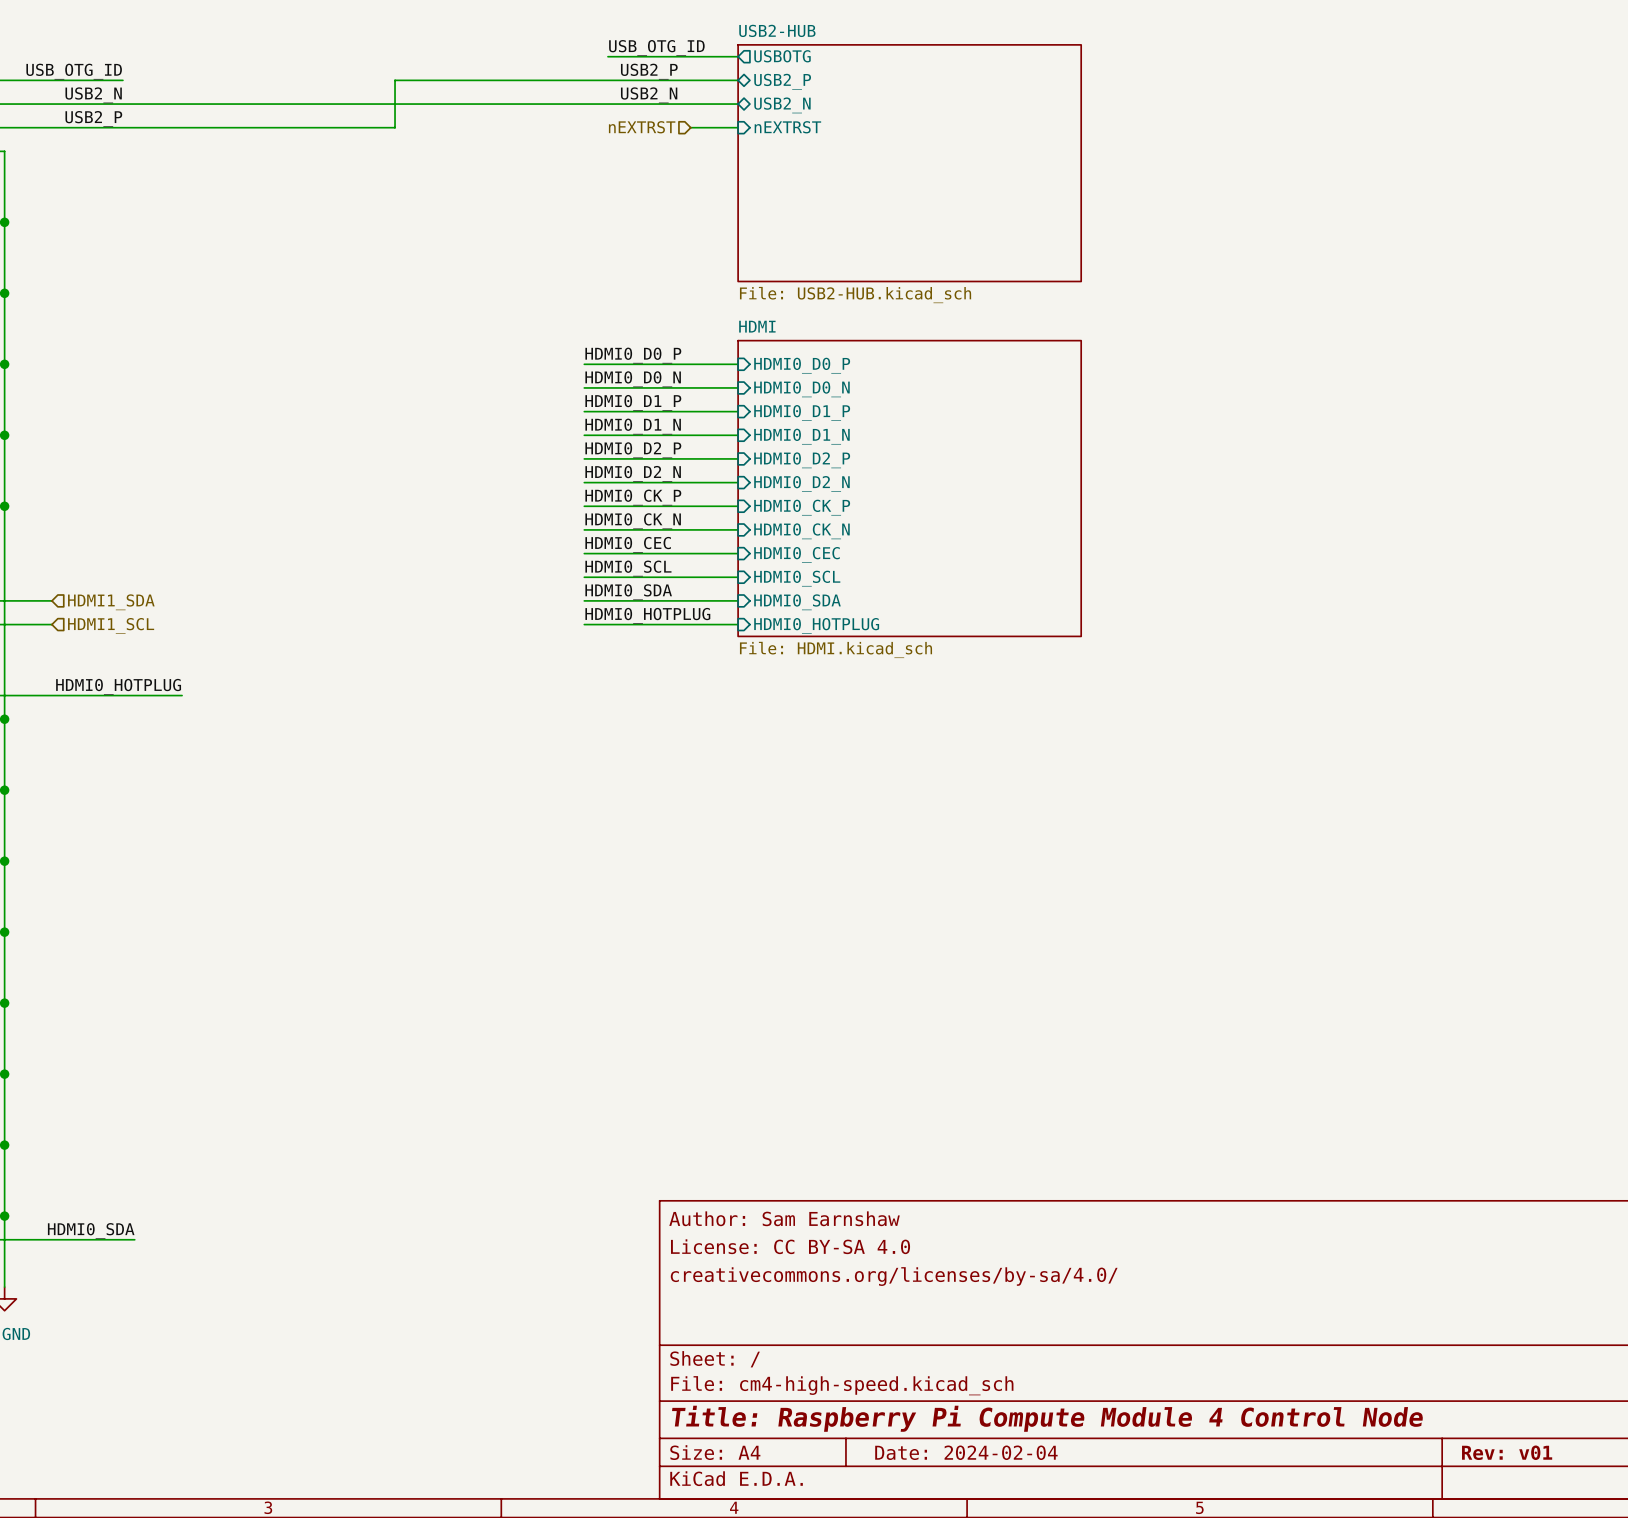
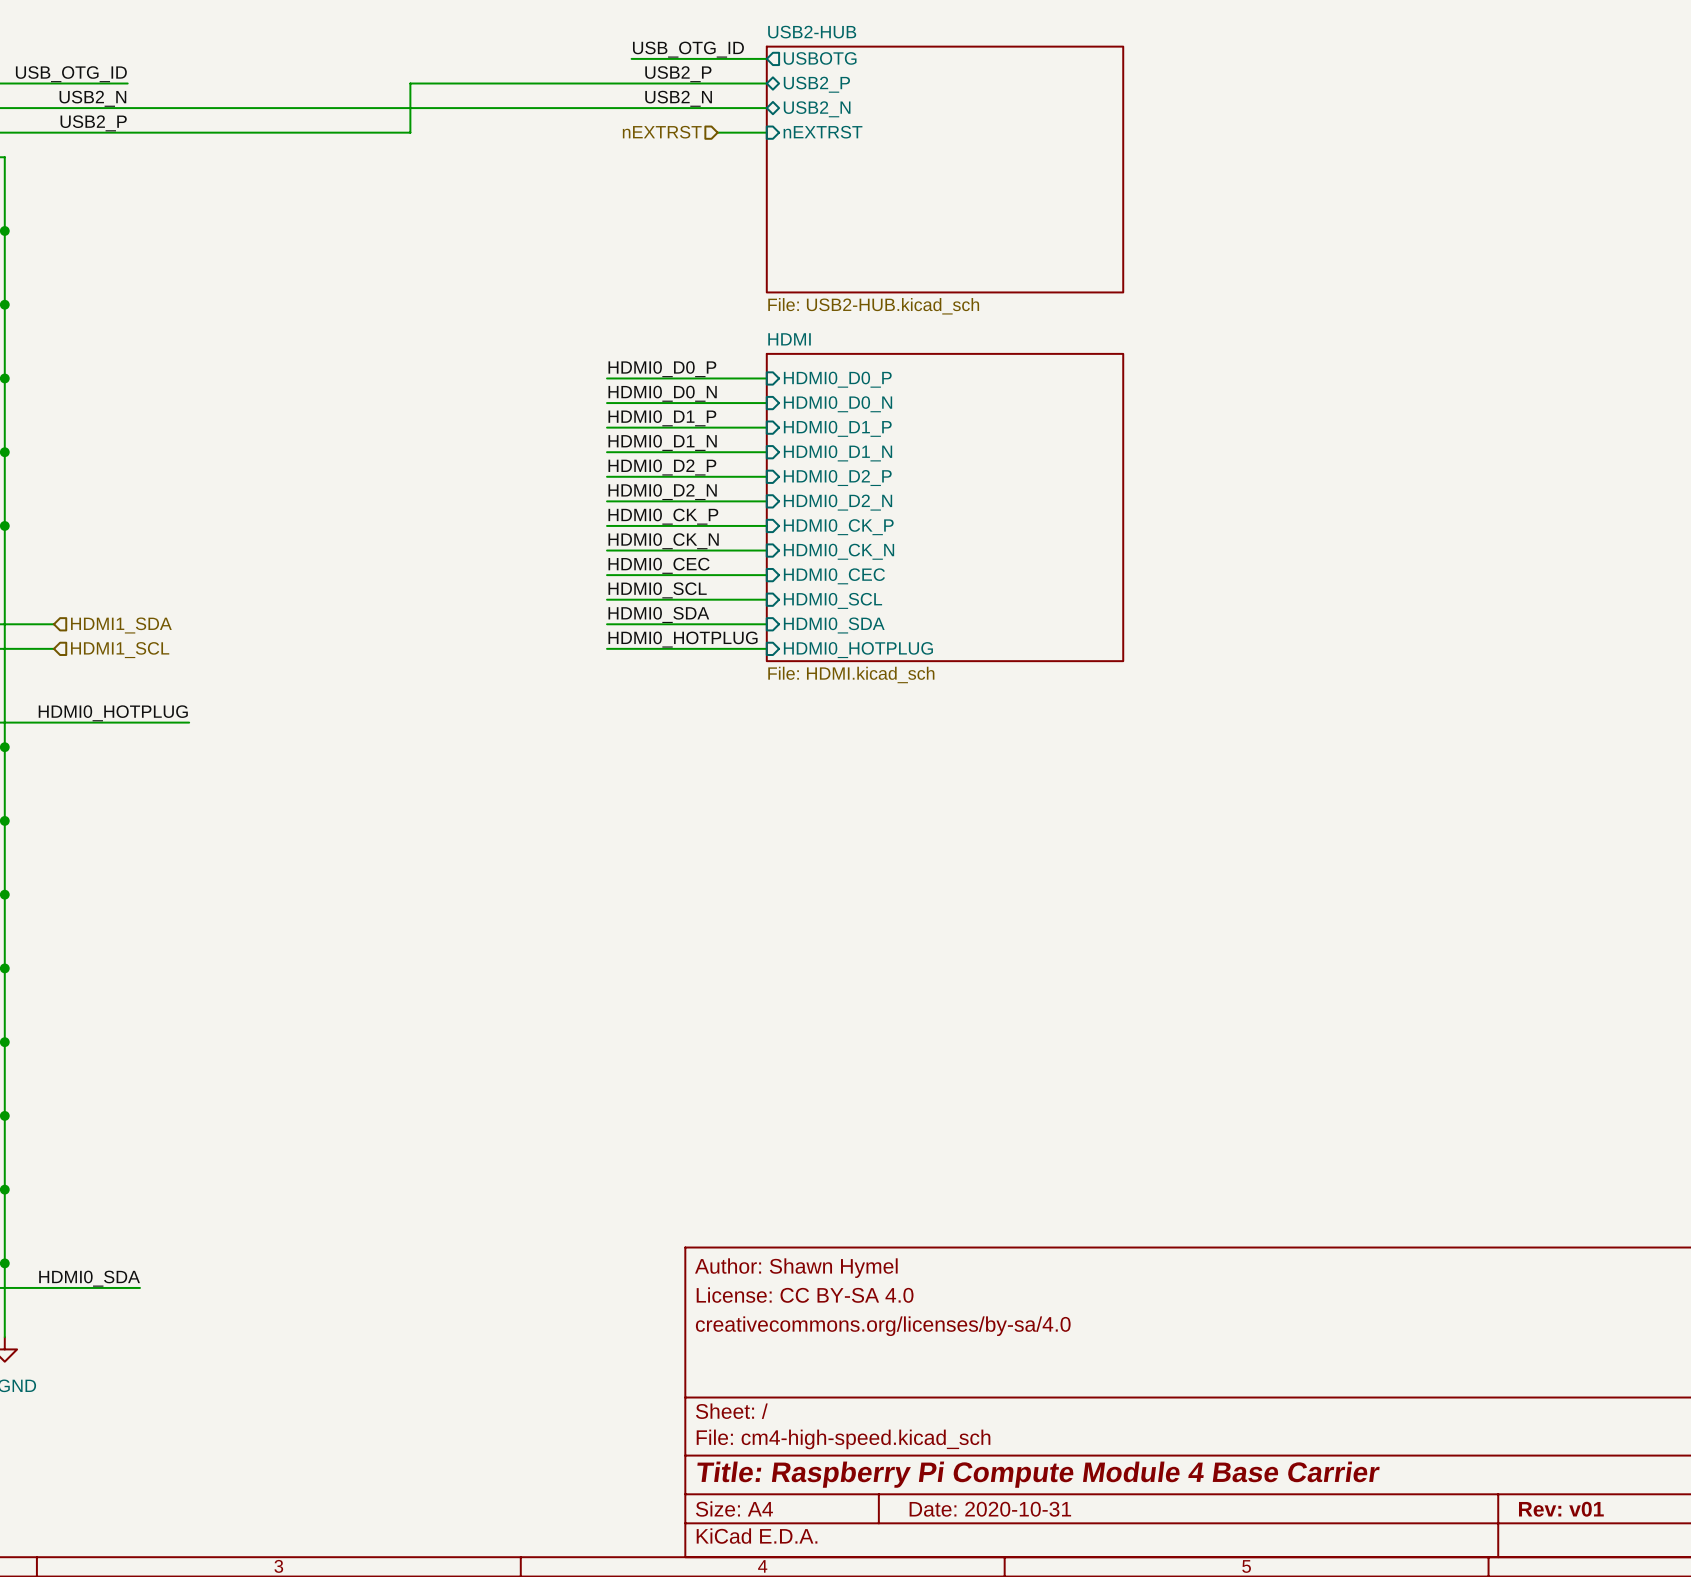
title block: Author: Sam Earnshaw (784, 1218) -> Author: Shawn Hymel (796, 1268)
title block: creativecommons.org/licenses/by-sa/4.0/ (894, 1276) -> creativecommons.org/licenses/by-sa/4.0 (883, 1326)
title block: Title: Raspberry Pi Compute Module 4 Control Node (1047, 1418) -> Title: Raspberry Pi Compute Module 4 Base Carrier (1038, 1474)
title block: Date: 2024-02-04 (966, 1452) -> Date: 2020-10-31 (990, 1509)

